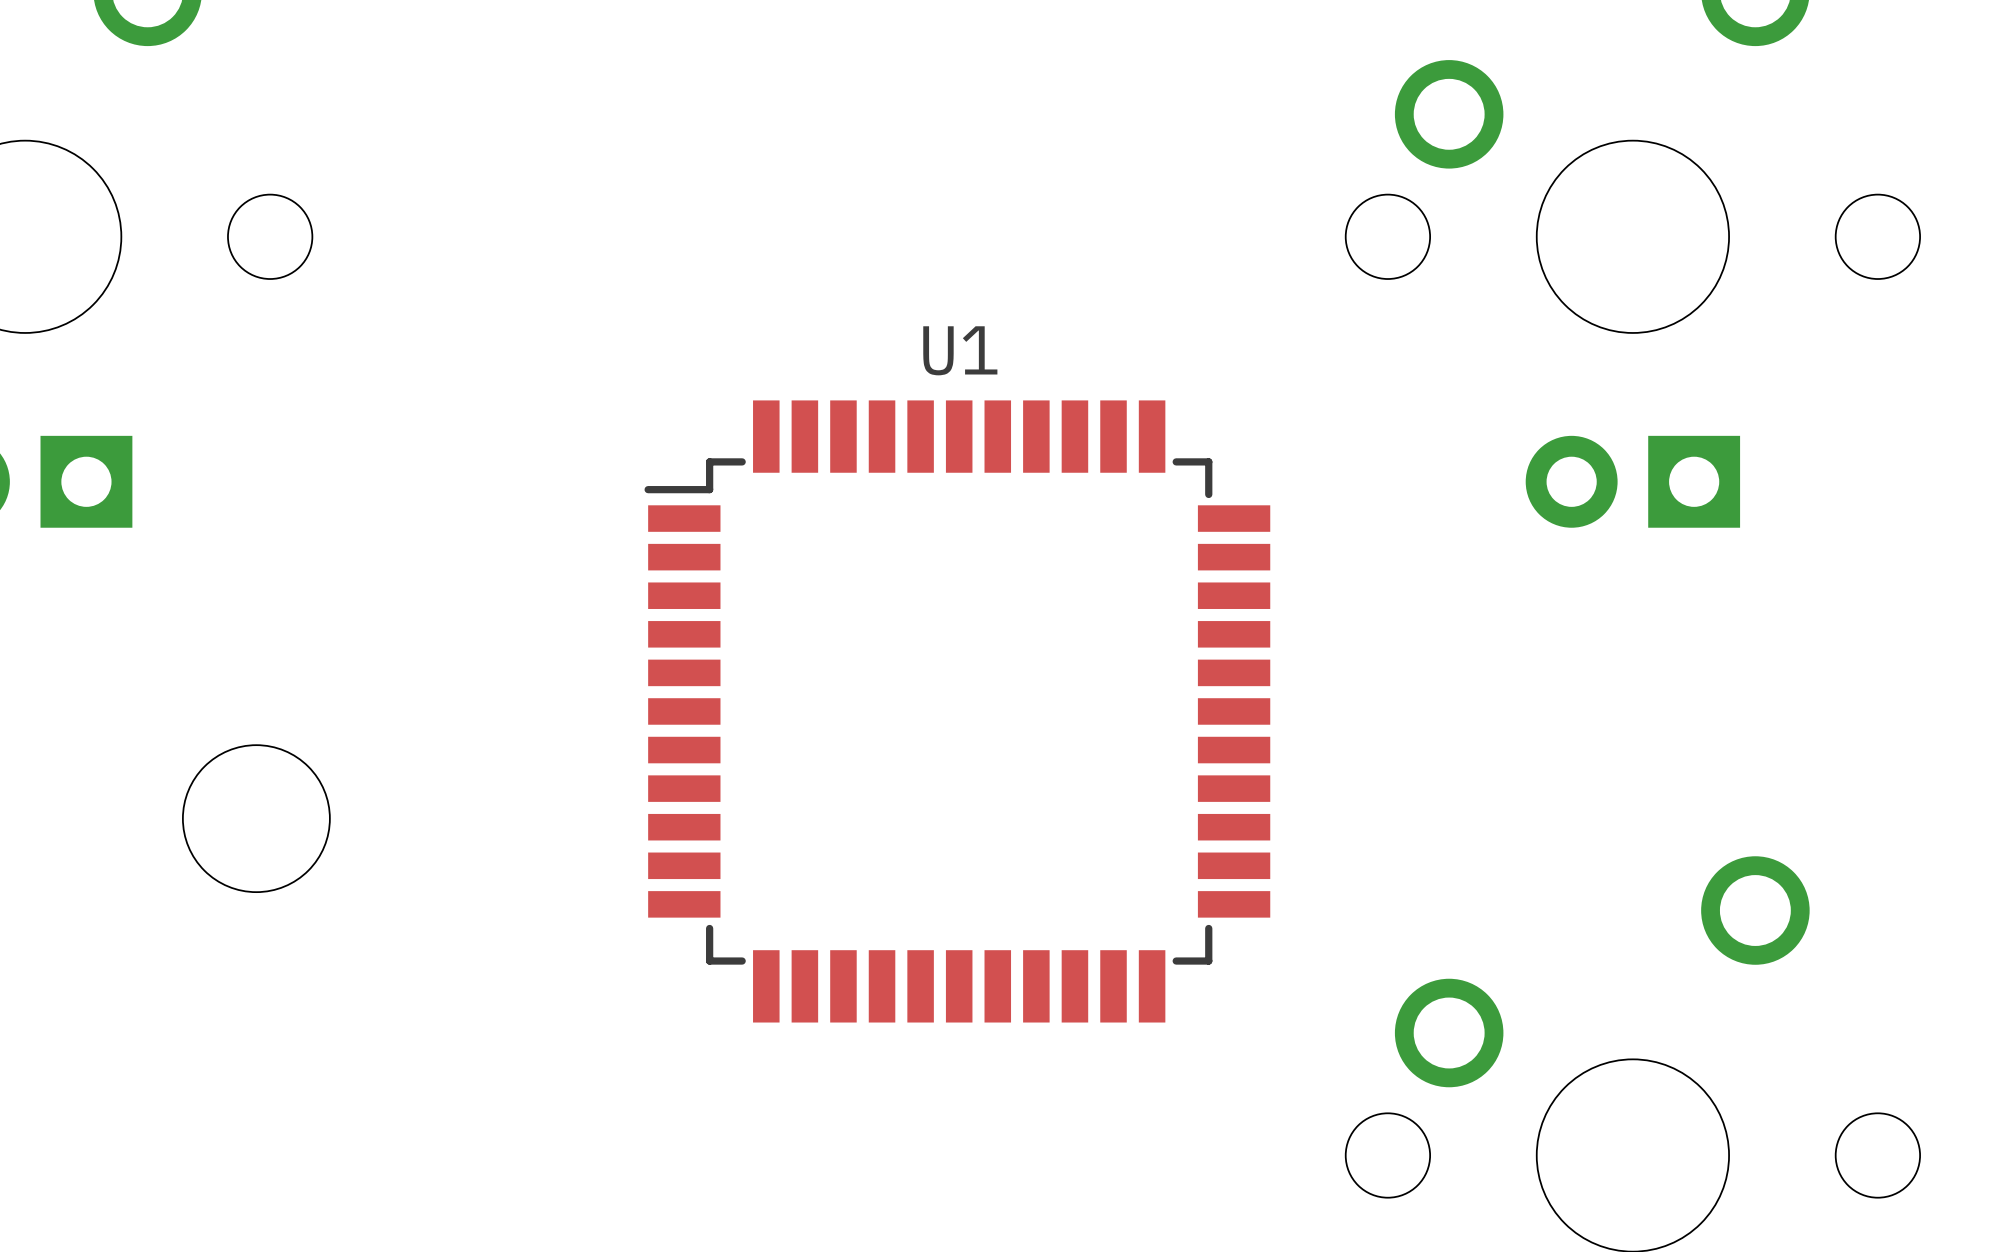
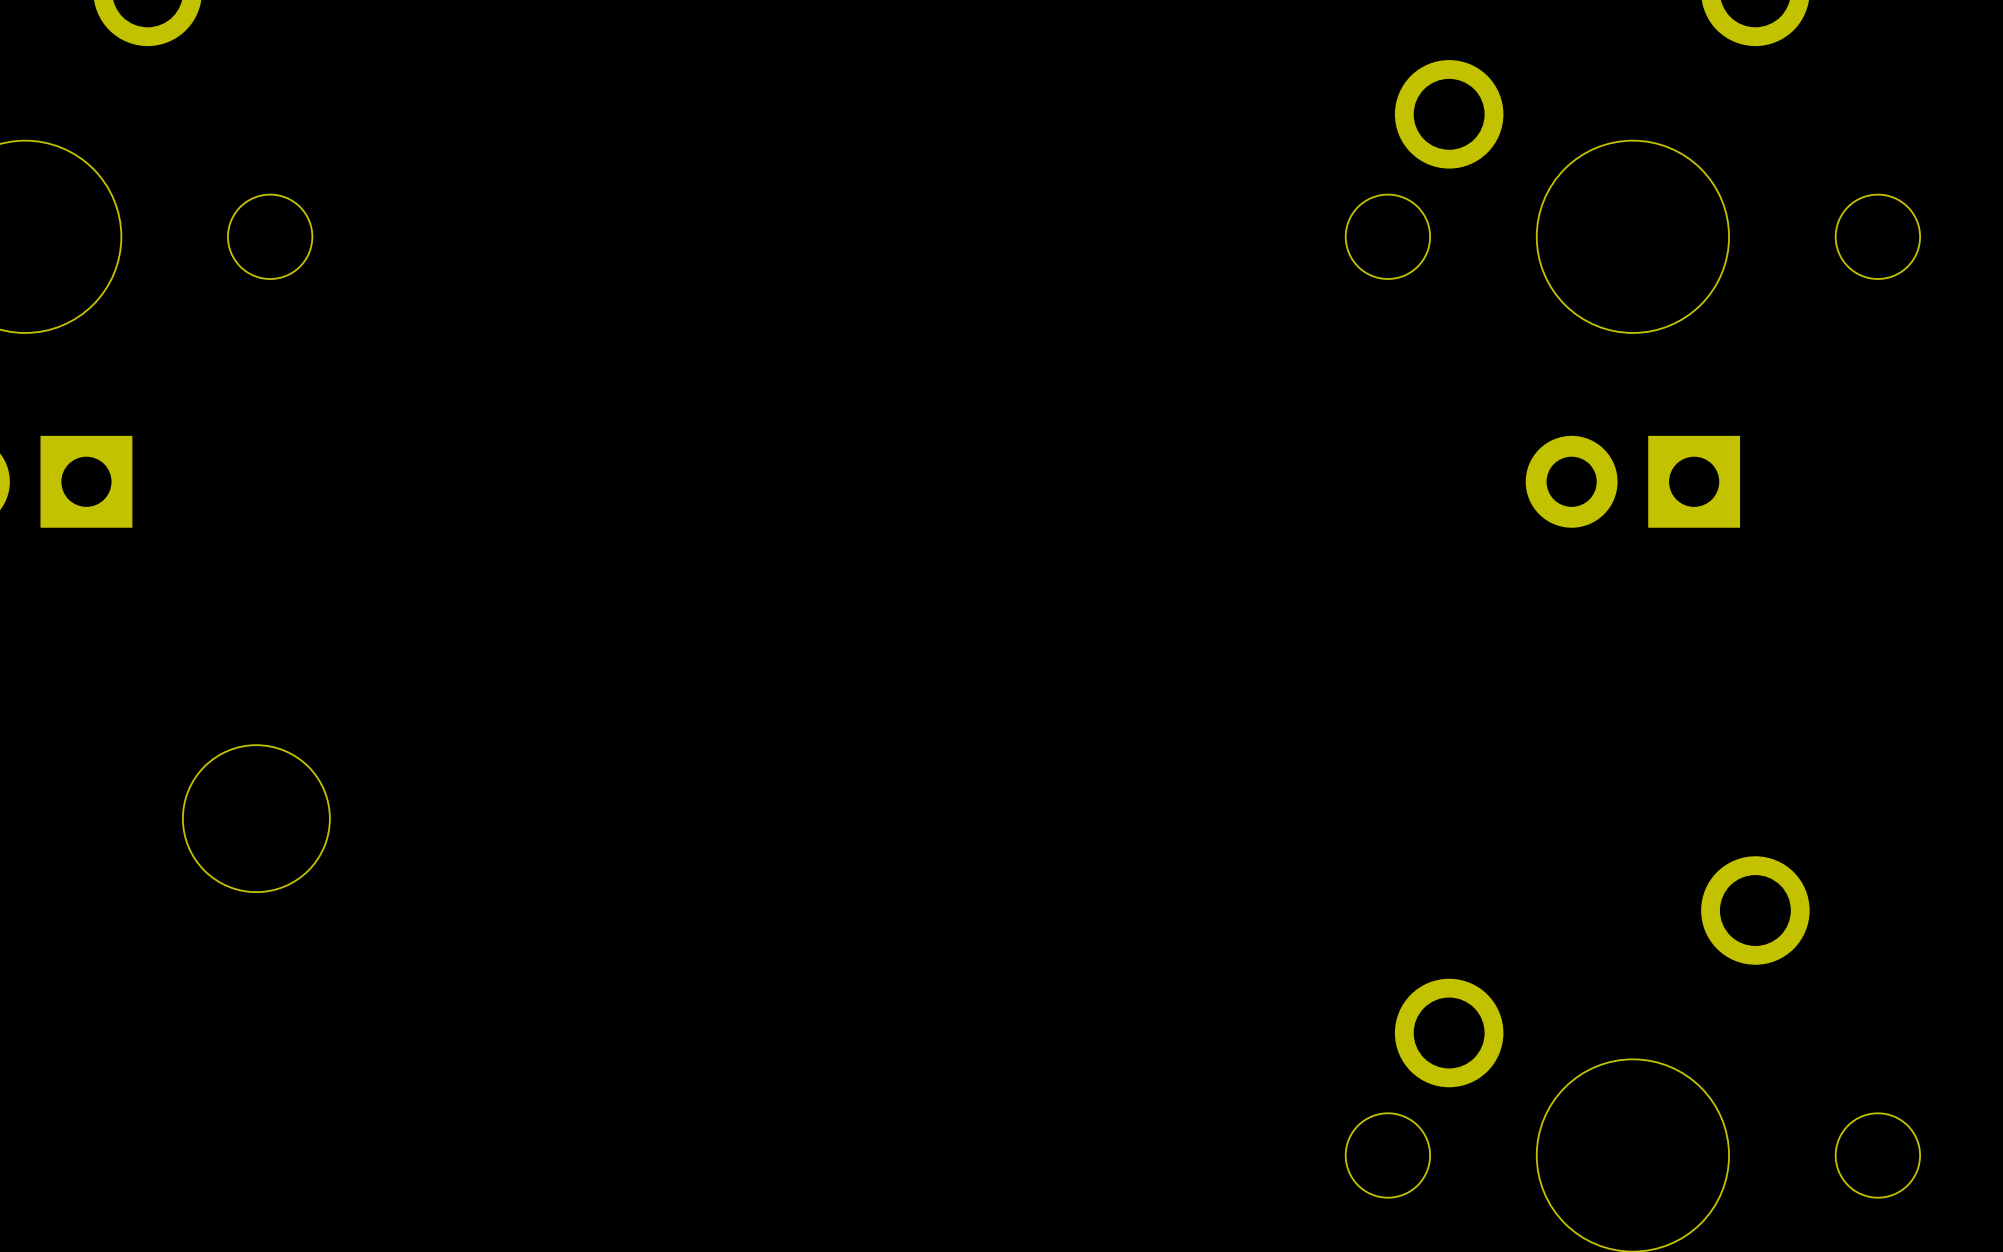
U1: (957, 711) -> none

